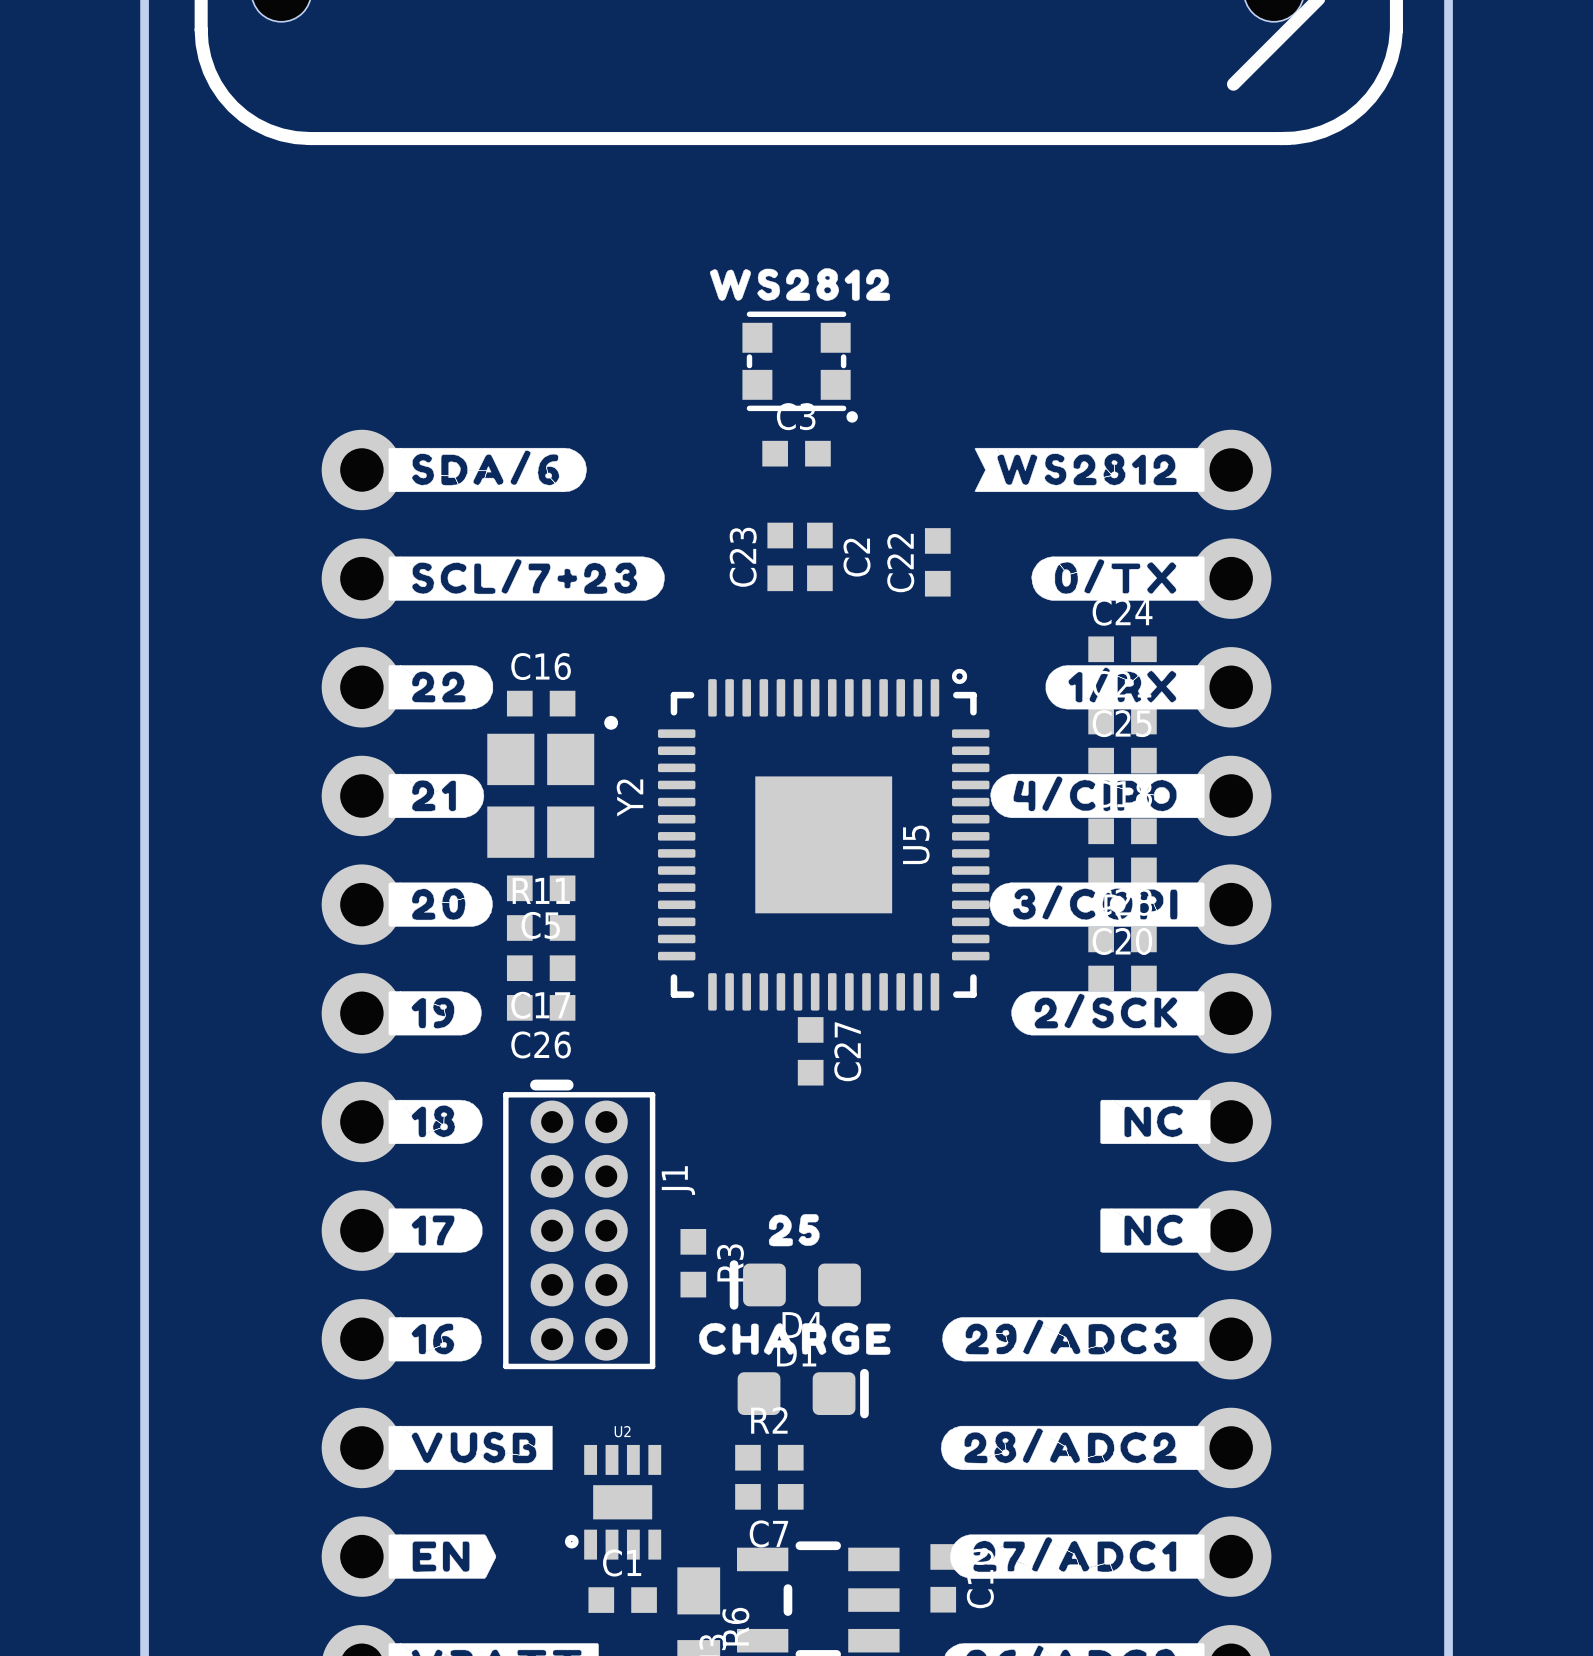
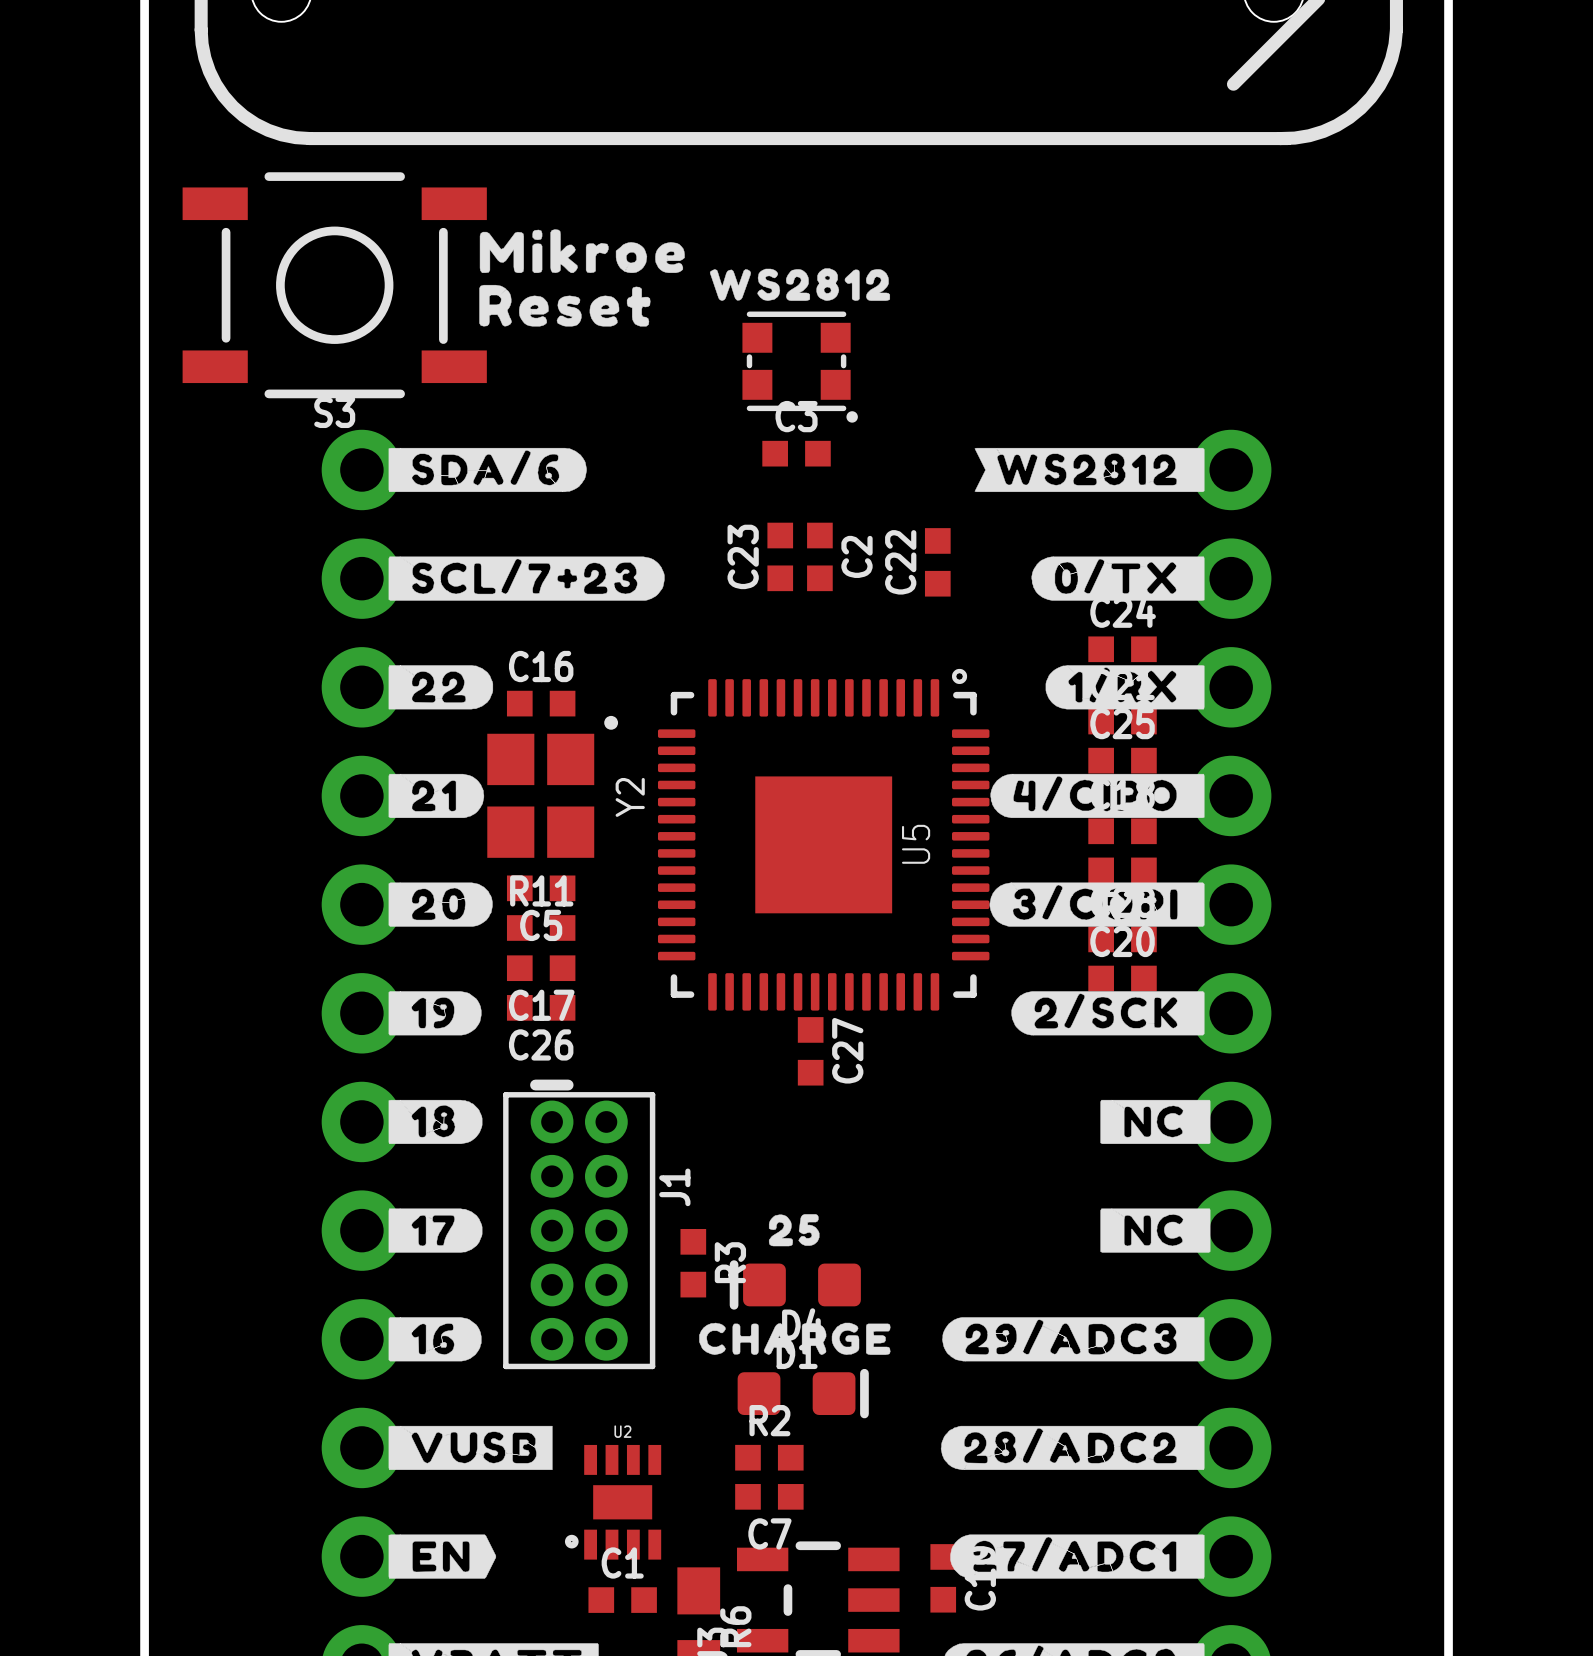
drawing: none -> [479, 229, 685, 327]
S3: none -> (334, 285)

